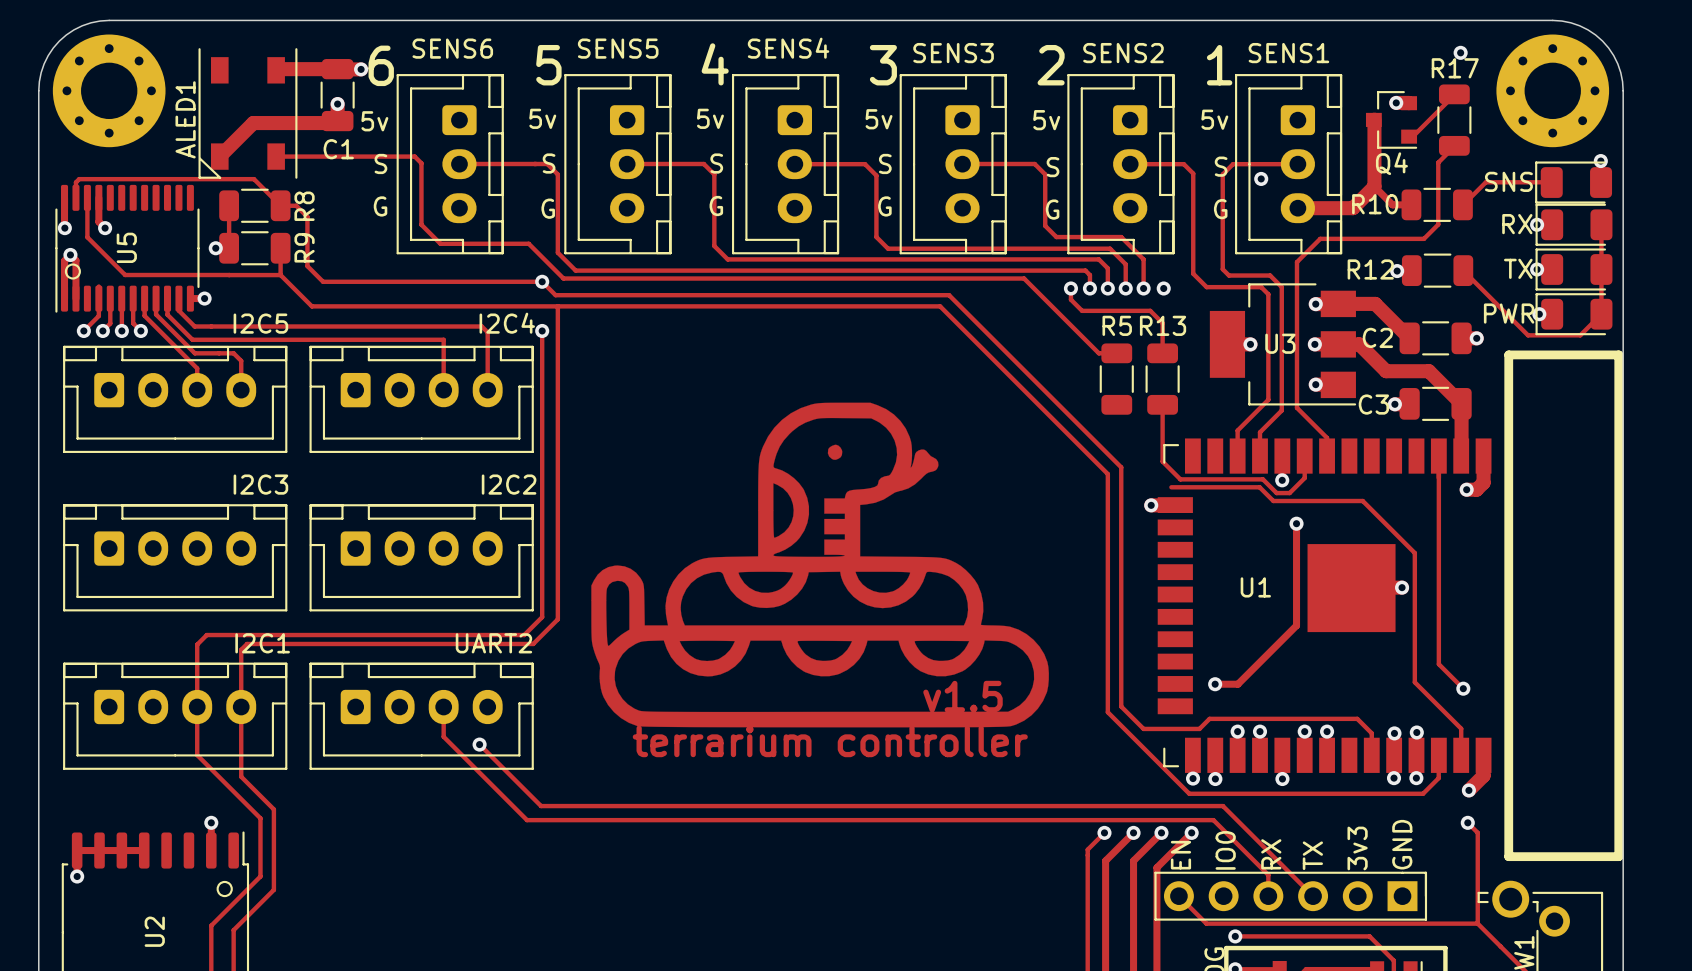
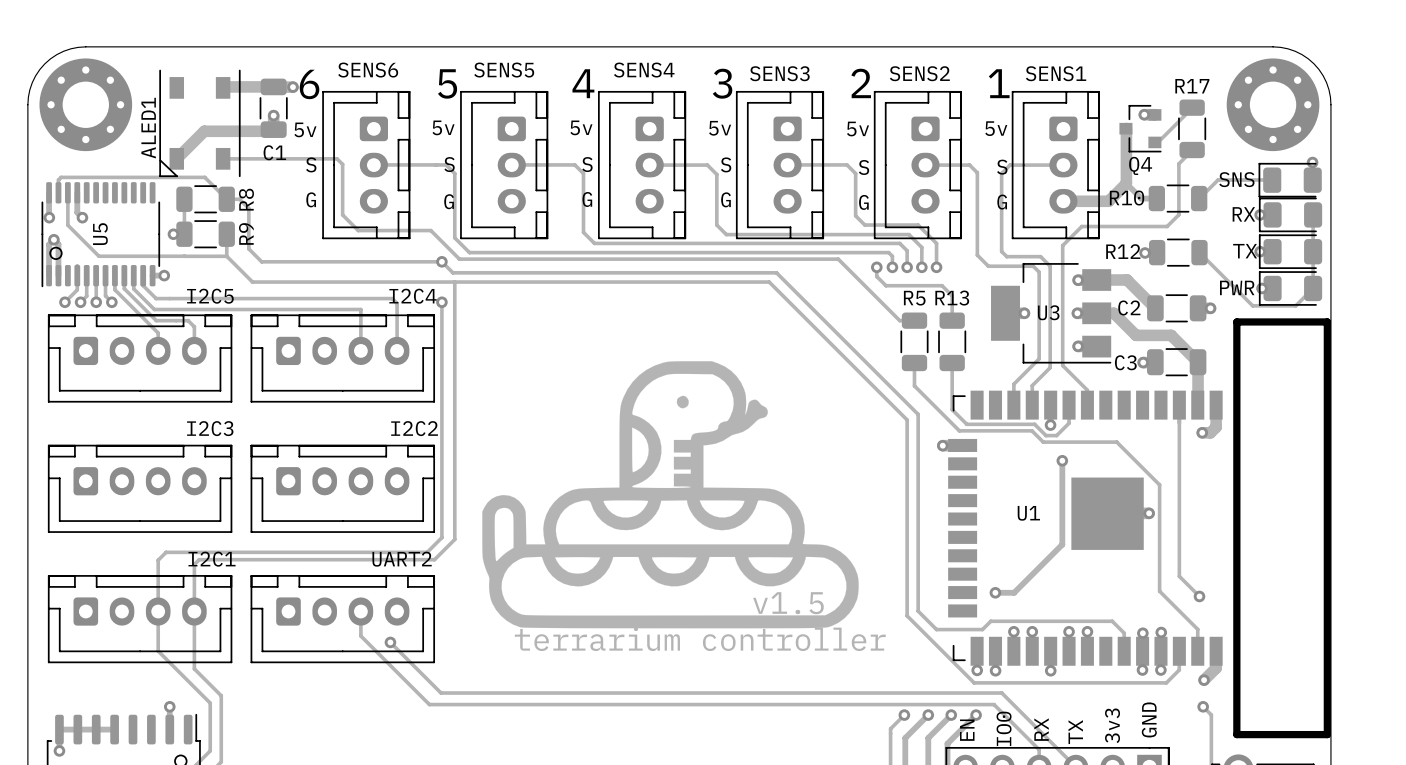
via: (1460, 52) -> none
via: (1261, 178) -> none
via: (1163, 288) -> none
track: none -> (914, 363) (914, 385) (959, 430)

